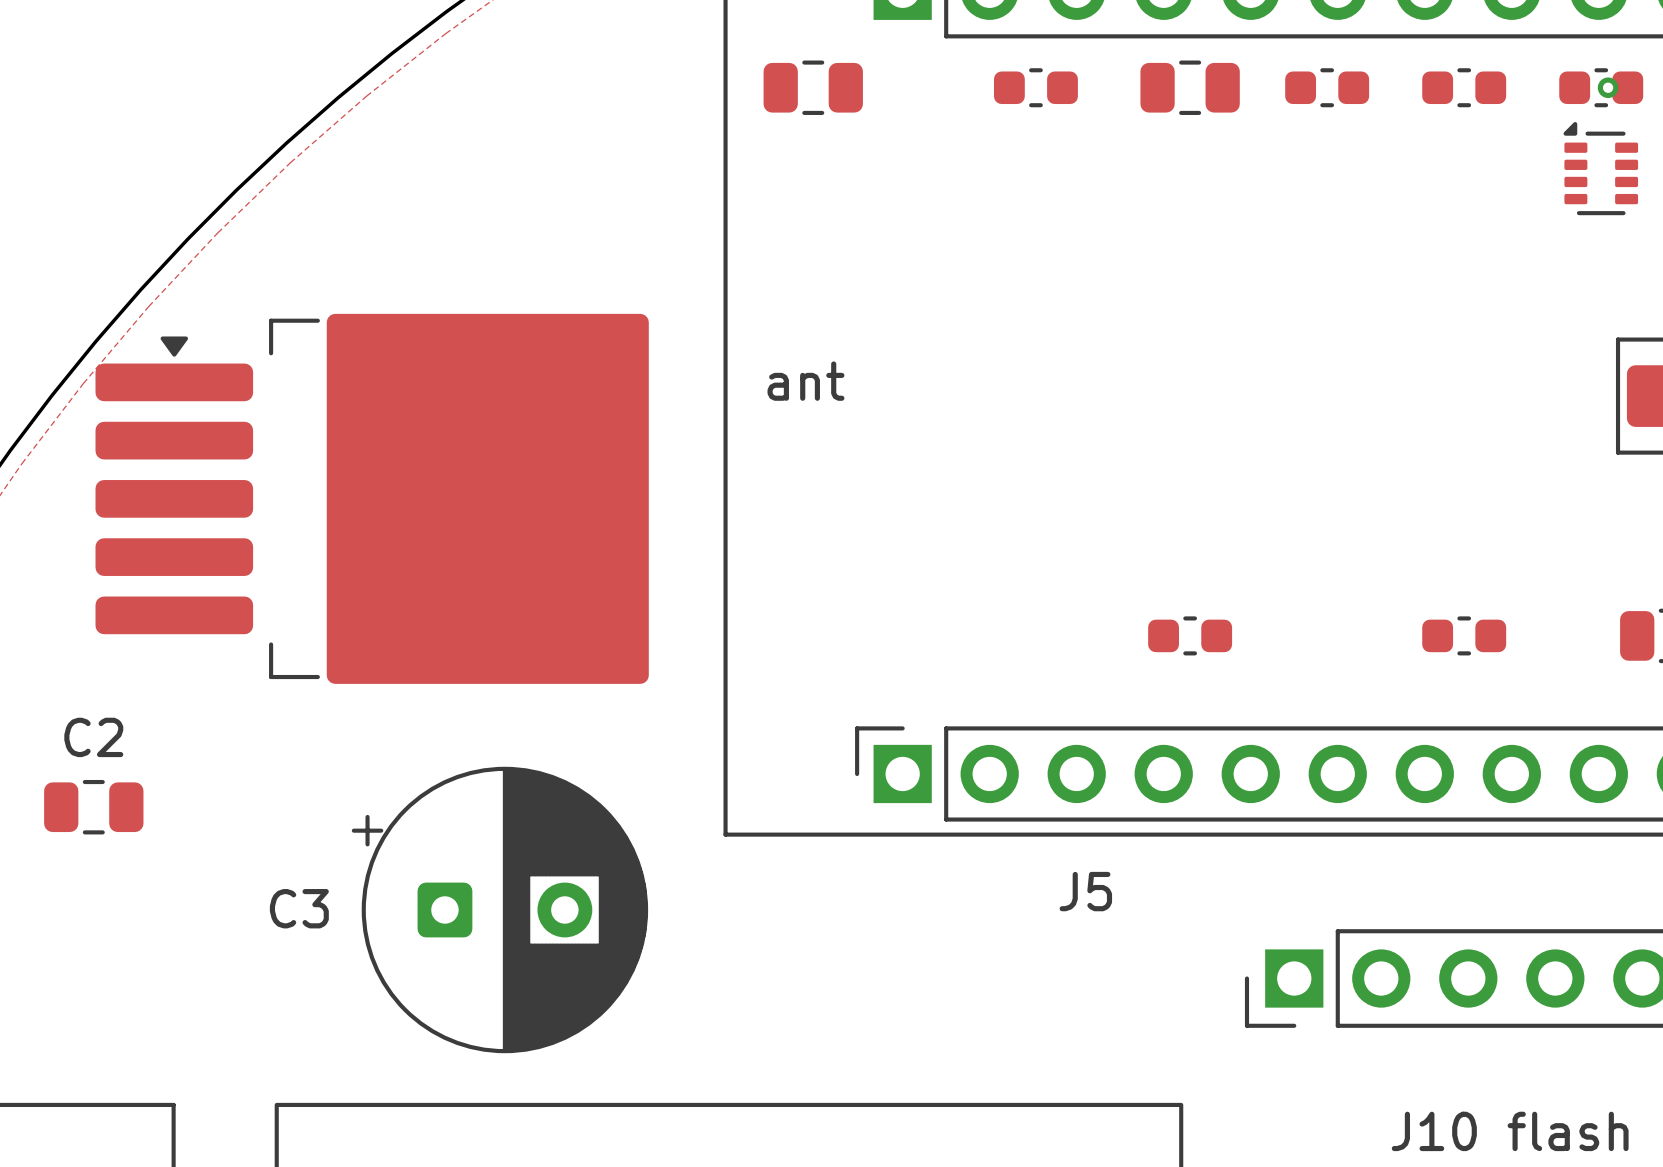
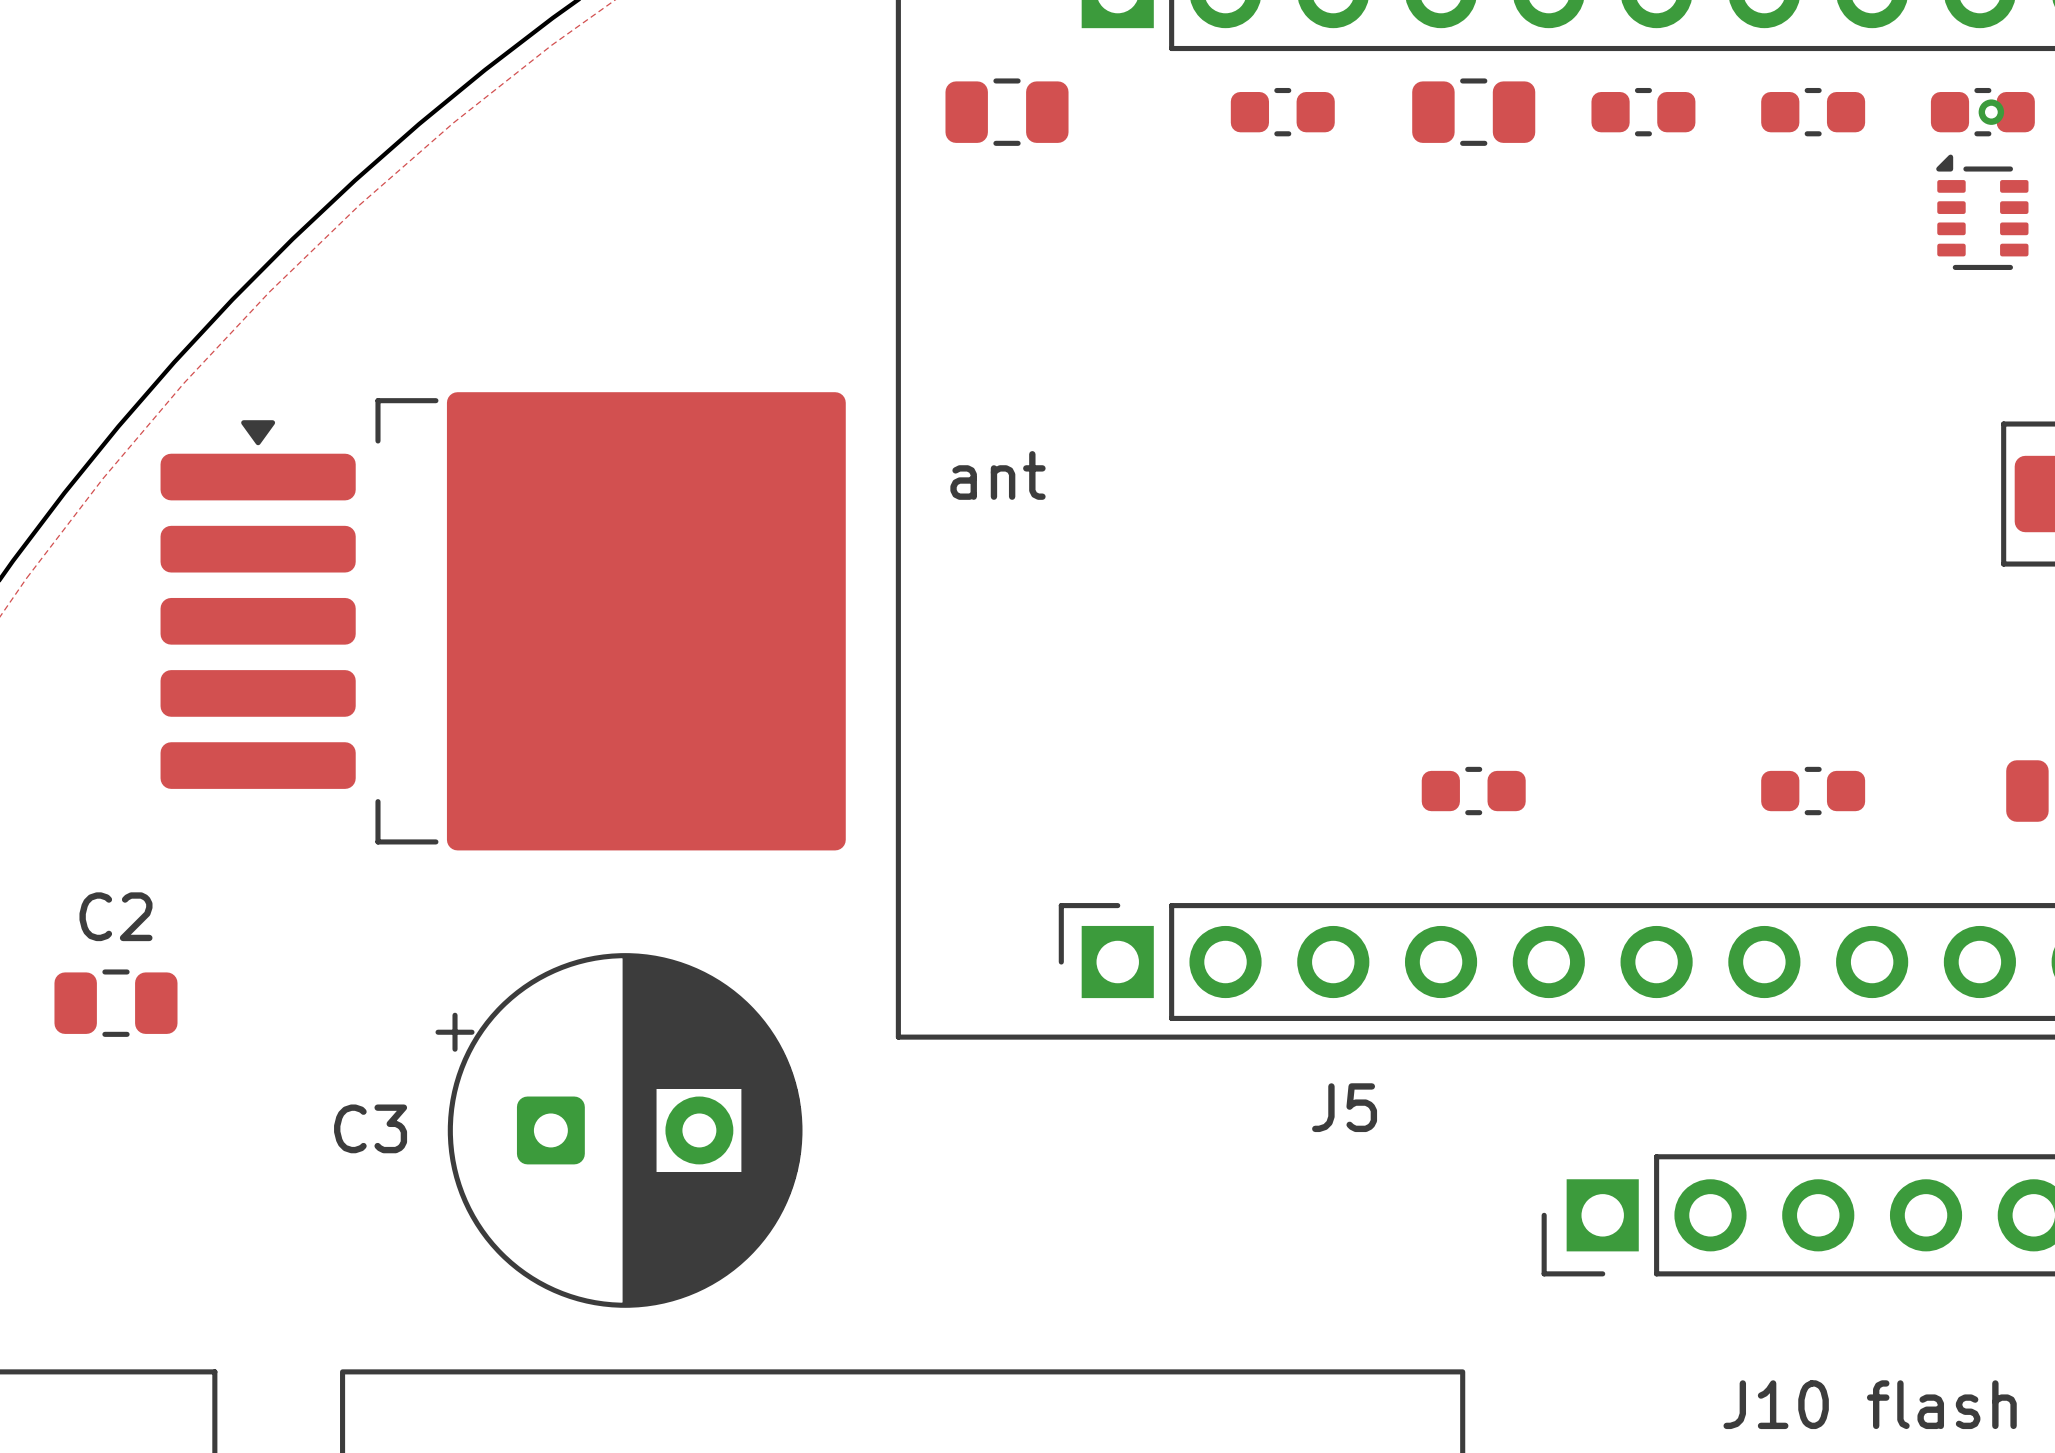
part position: (372, 498) -> (503, 621)

